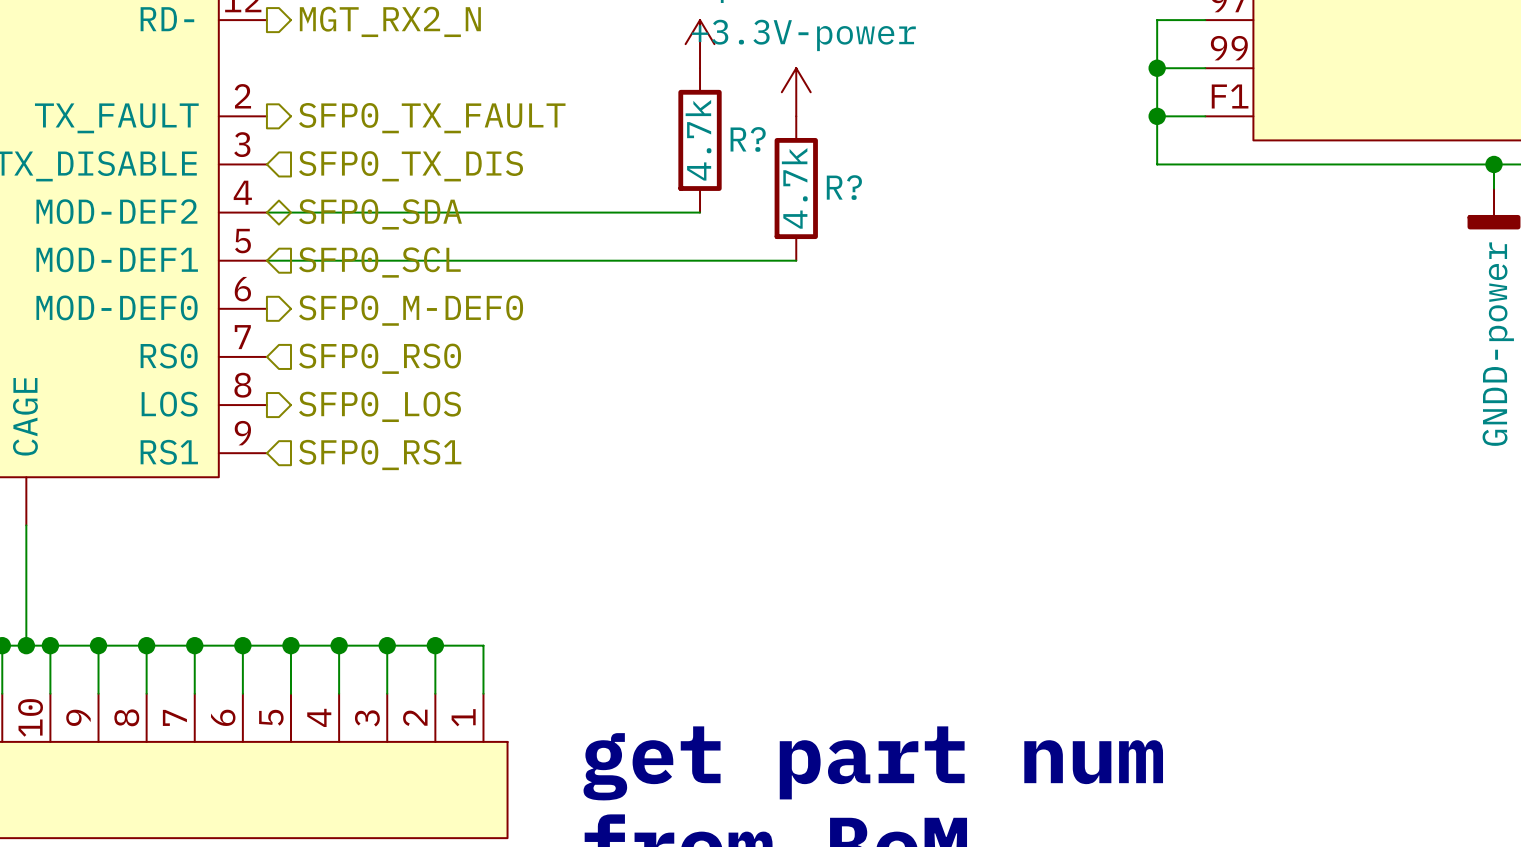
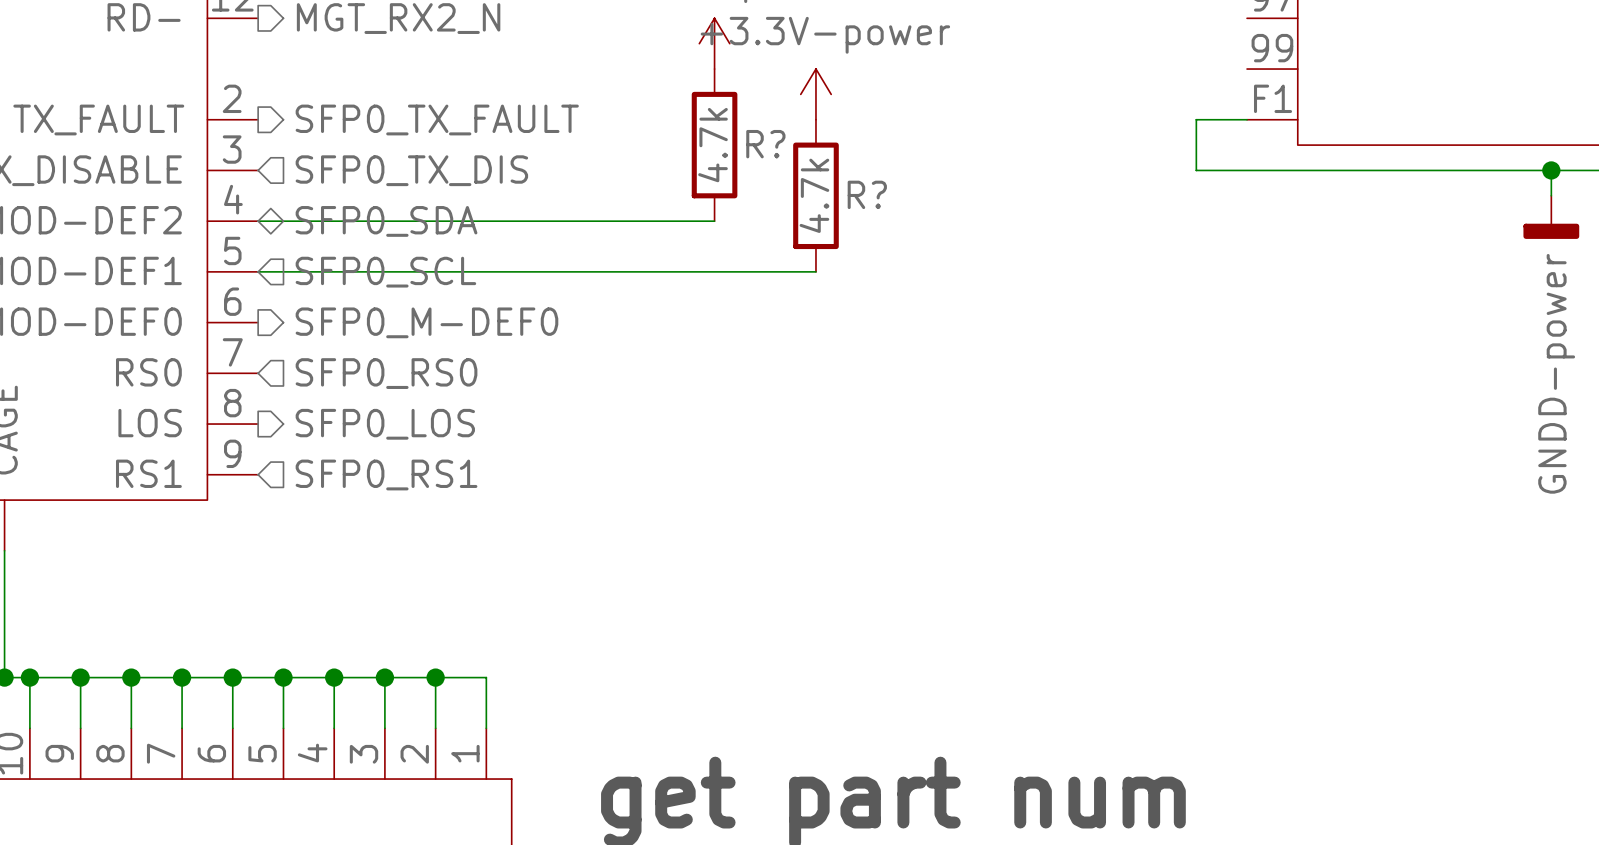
wire: (1205, 20) (1157, 20) (1157, 116) -> none
wire: (1157, 68) (1205, 68) -> none
junction: (1157, 68) -> none
junction: (1157, 116) -> none

